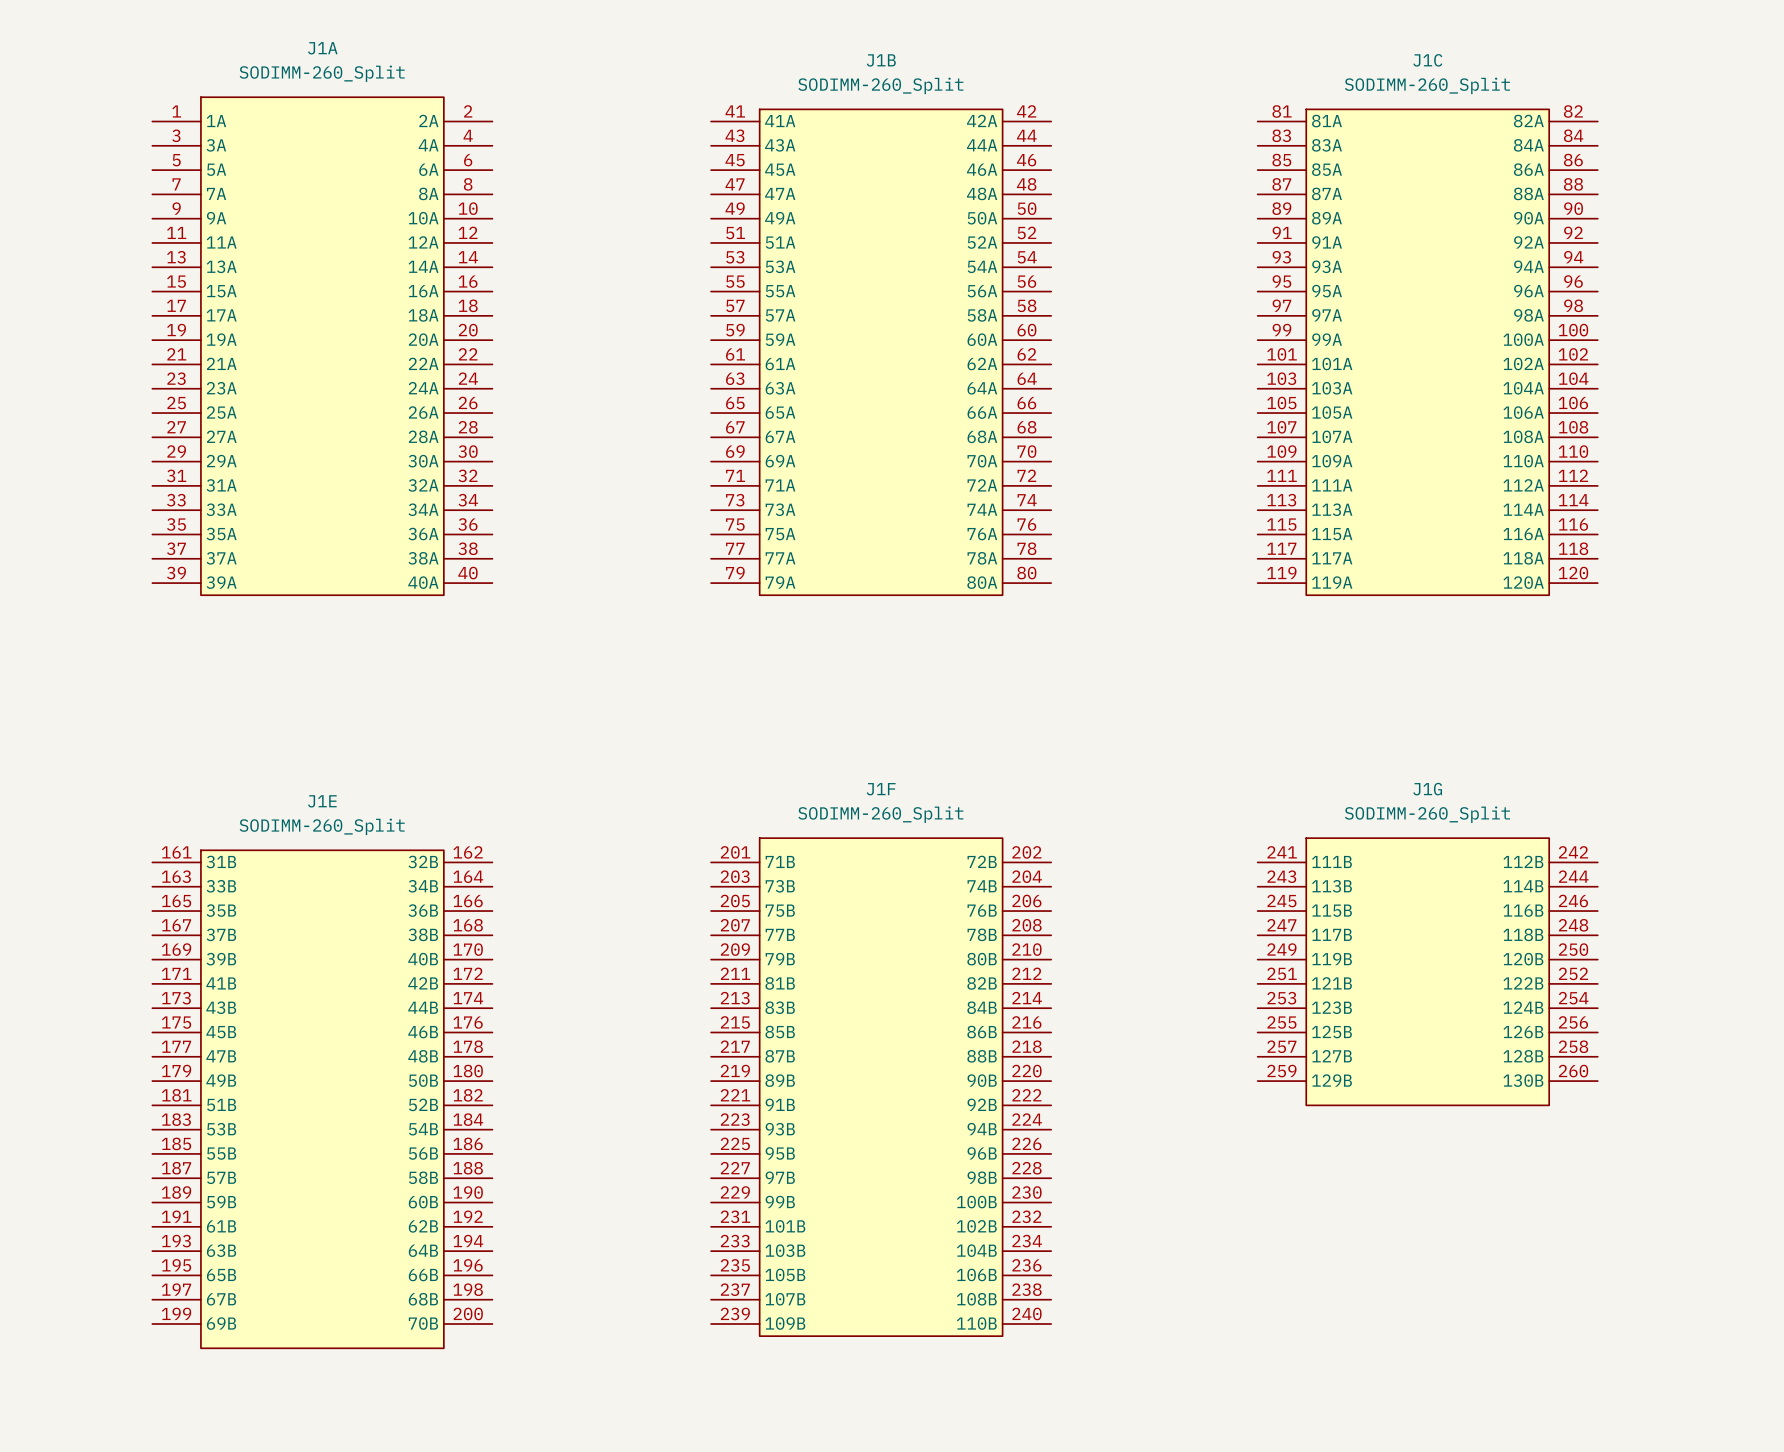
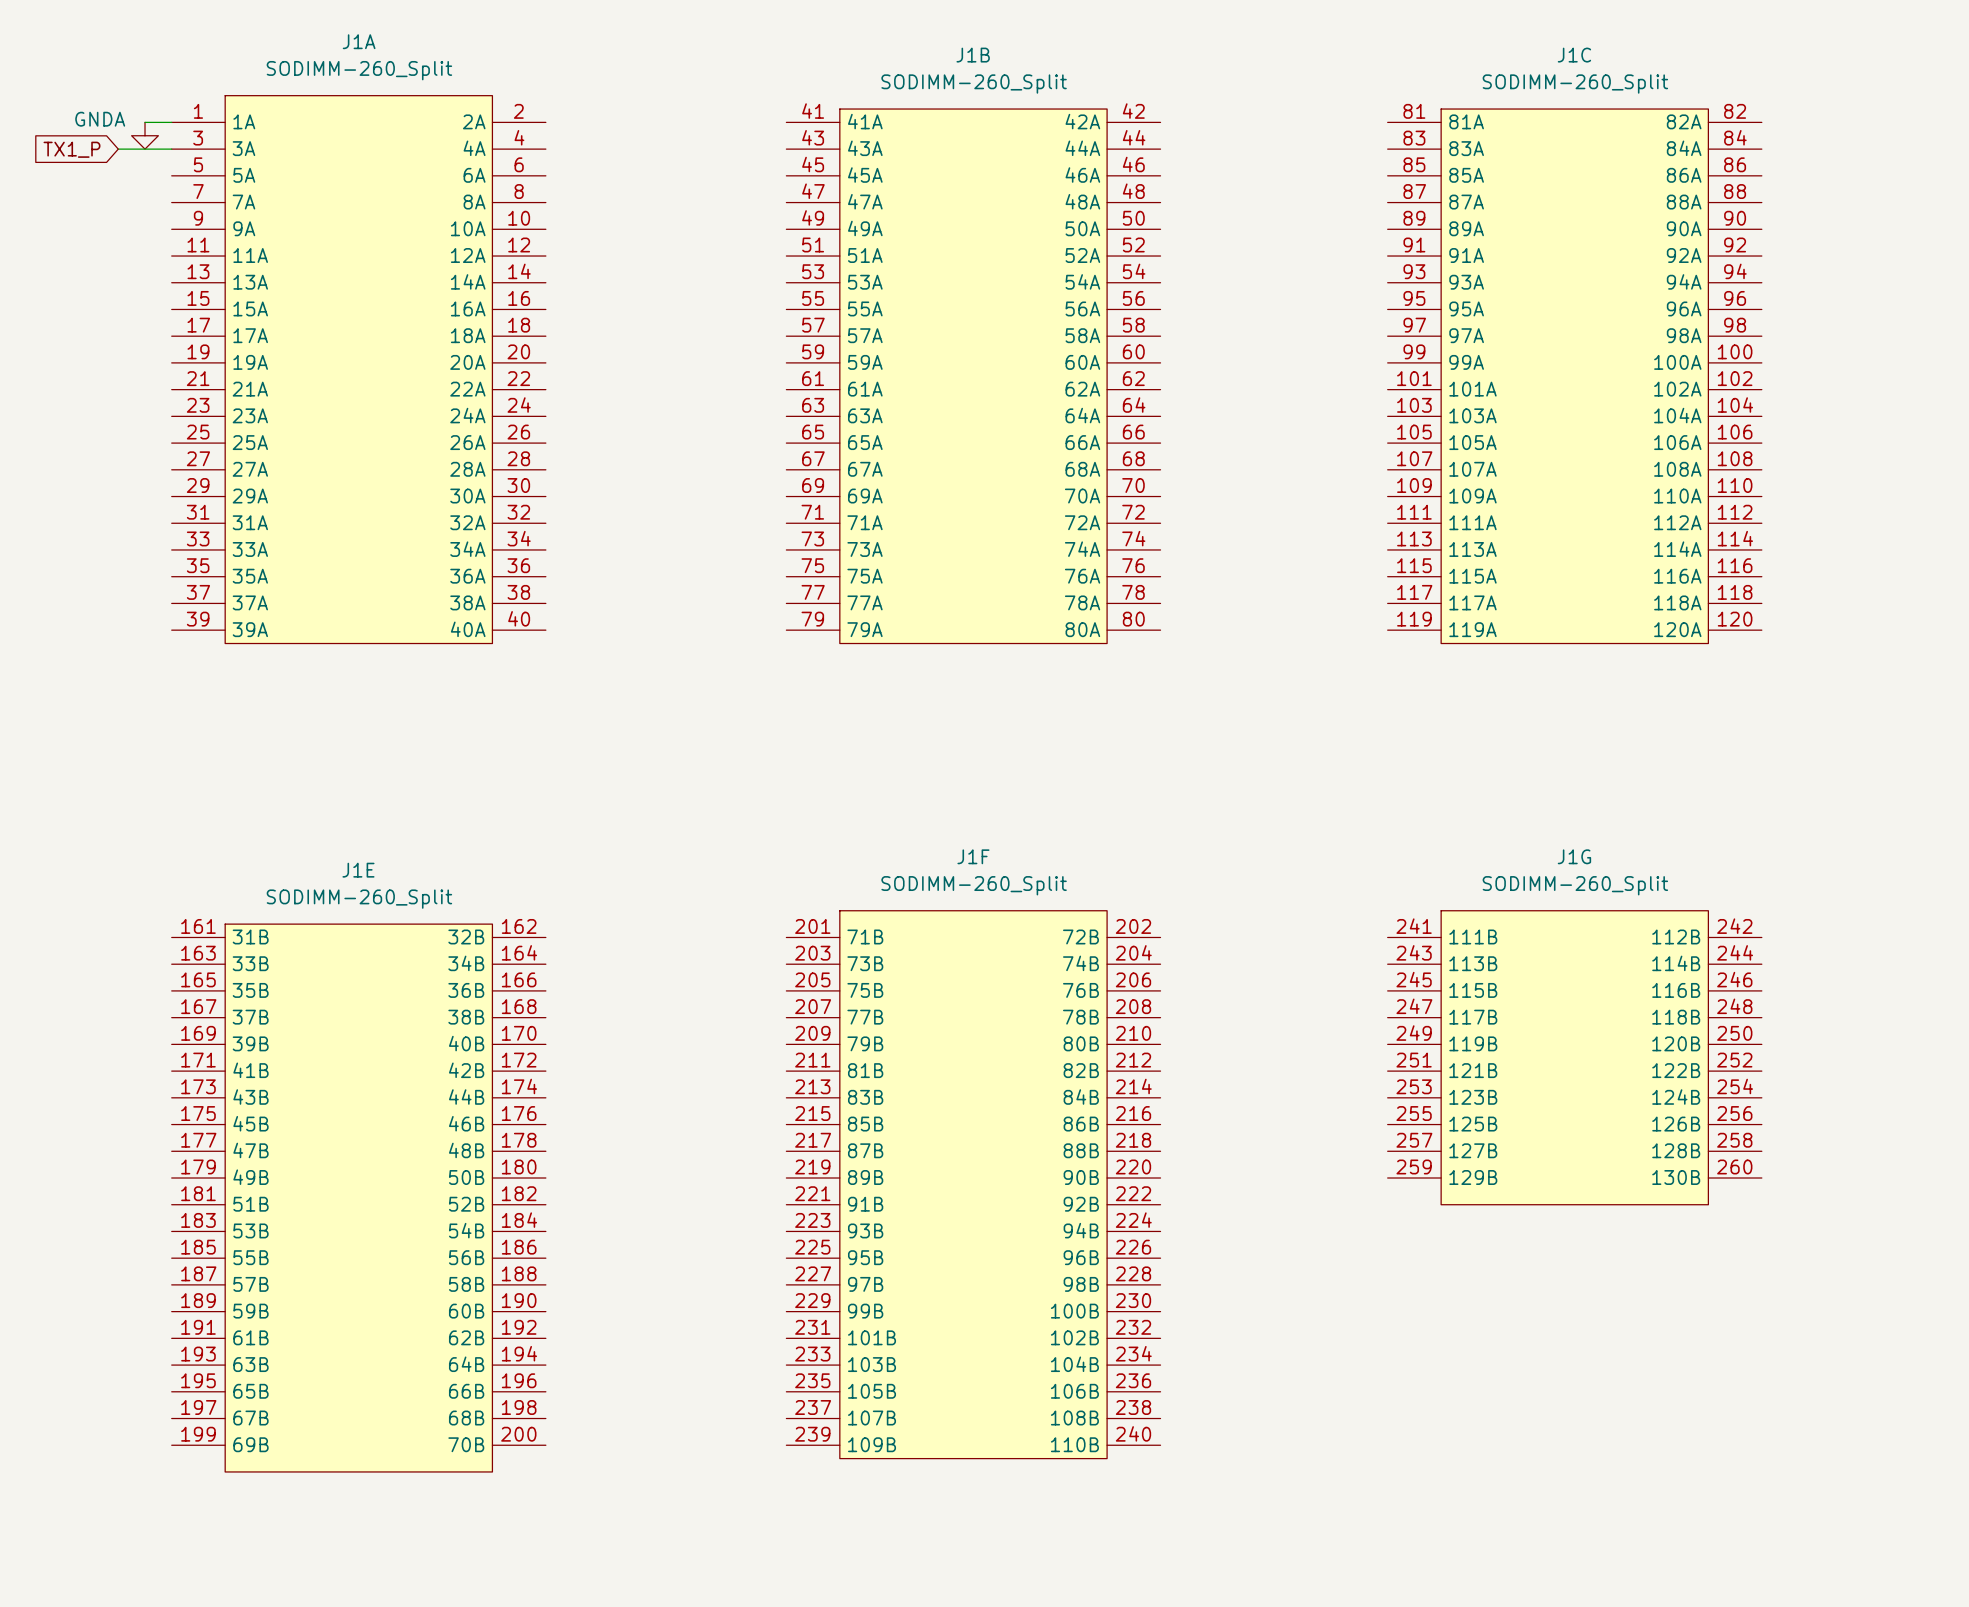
wire: none -> (145, 122) (171, 122)
power symbol: none -> GNDA (145, 135)
wire: none -> (118, 149) (171, 149)
global label: none -> TX1_P (71, 149)

